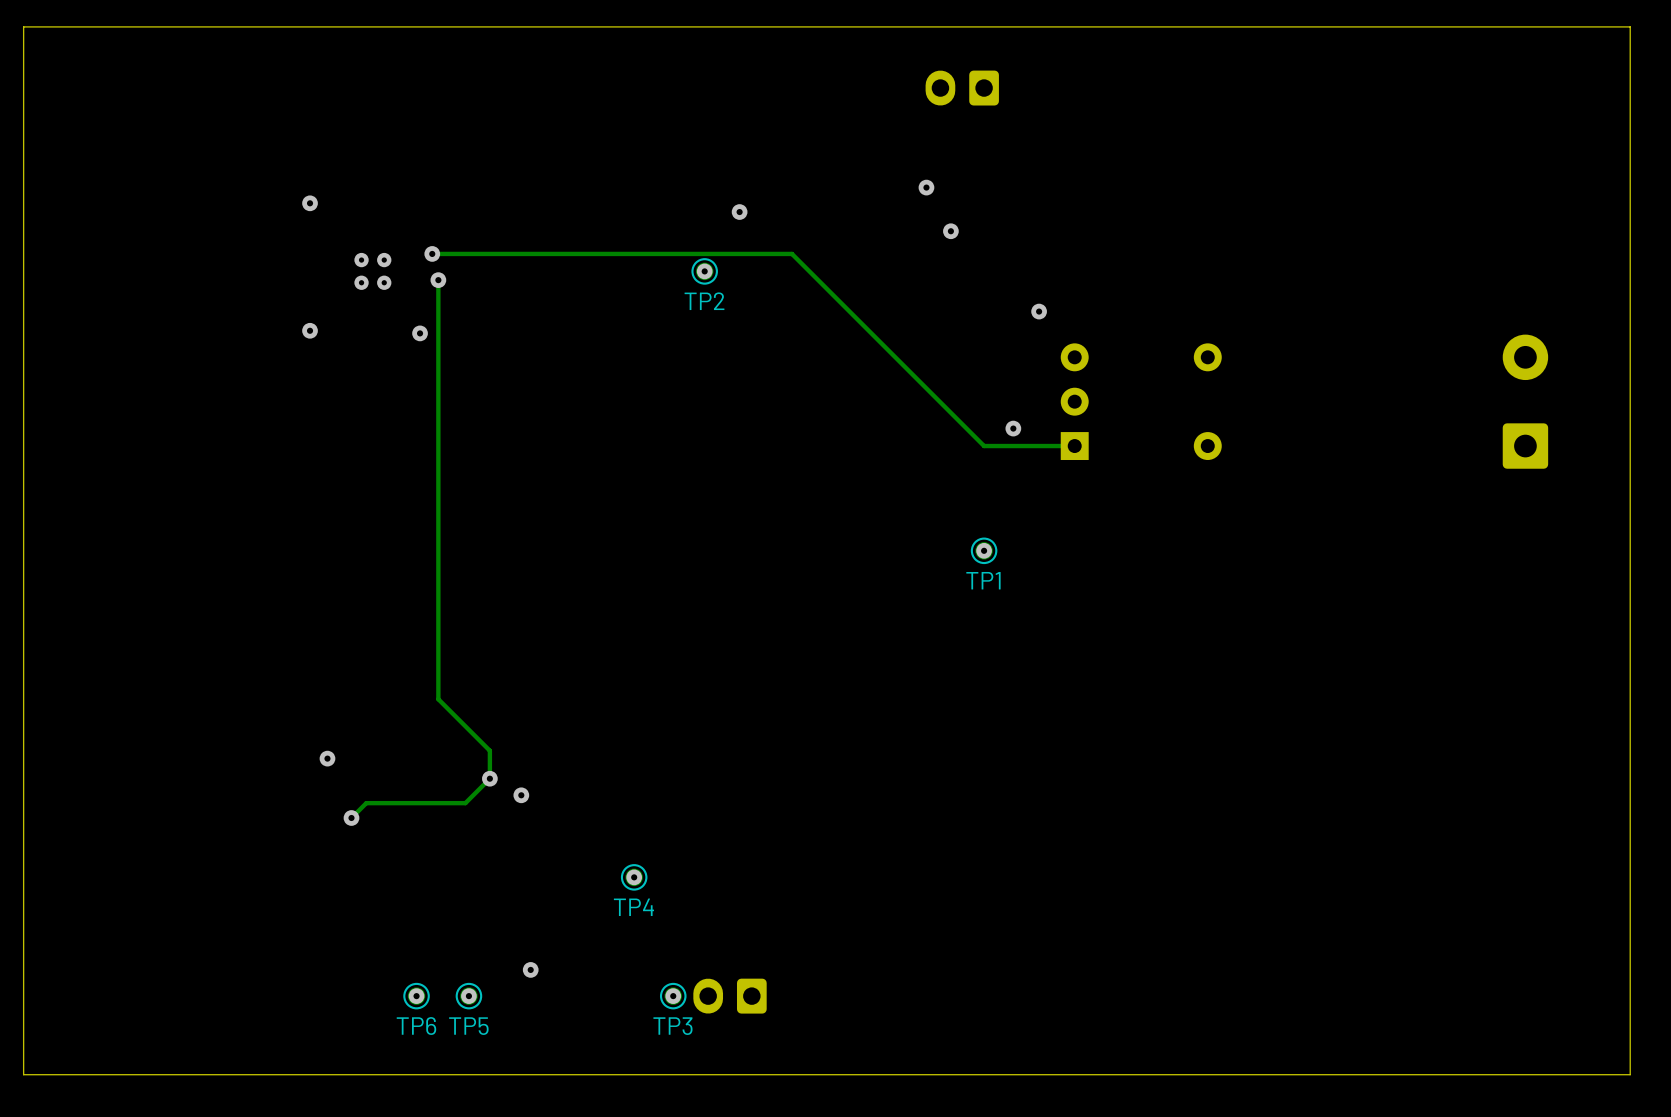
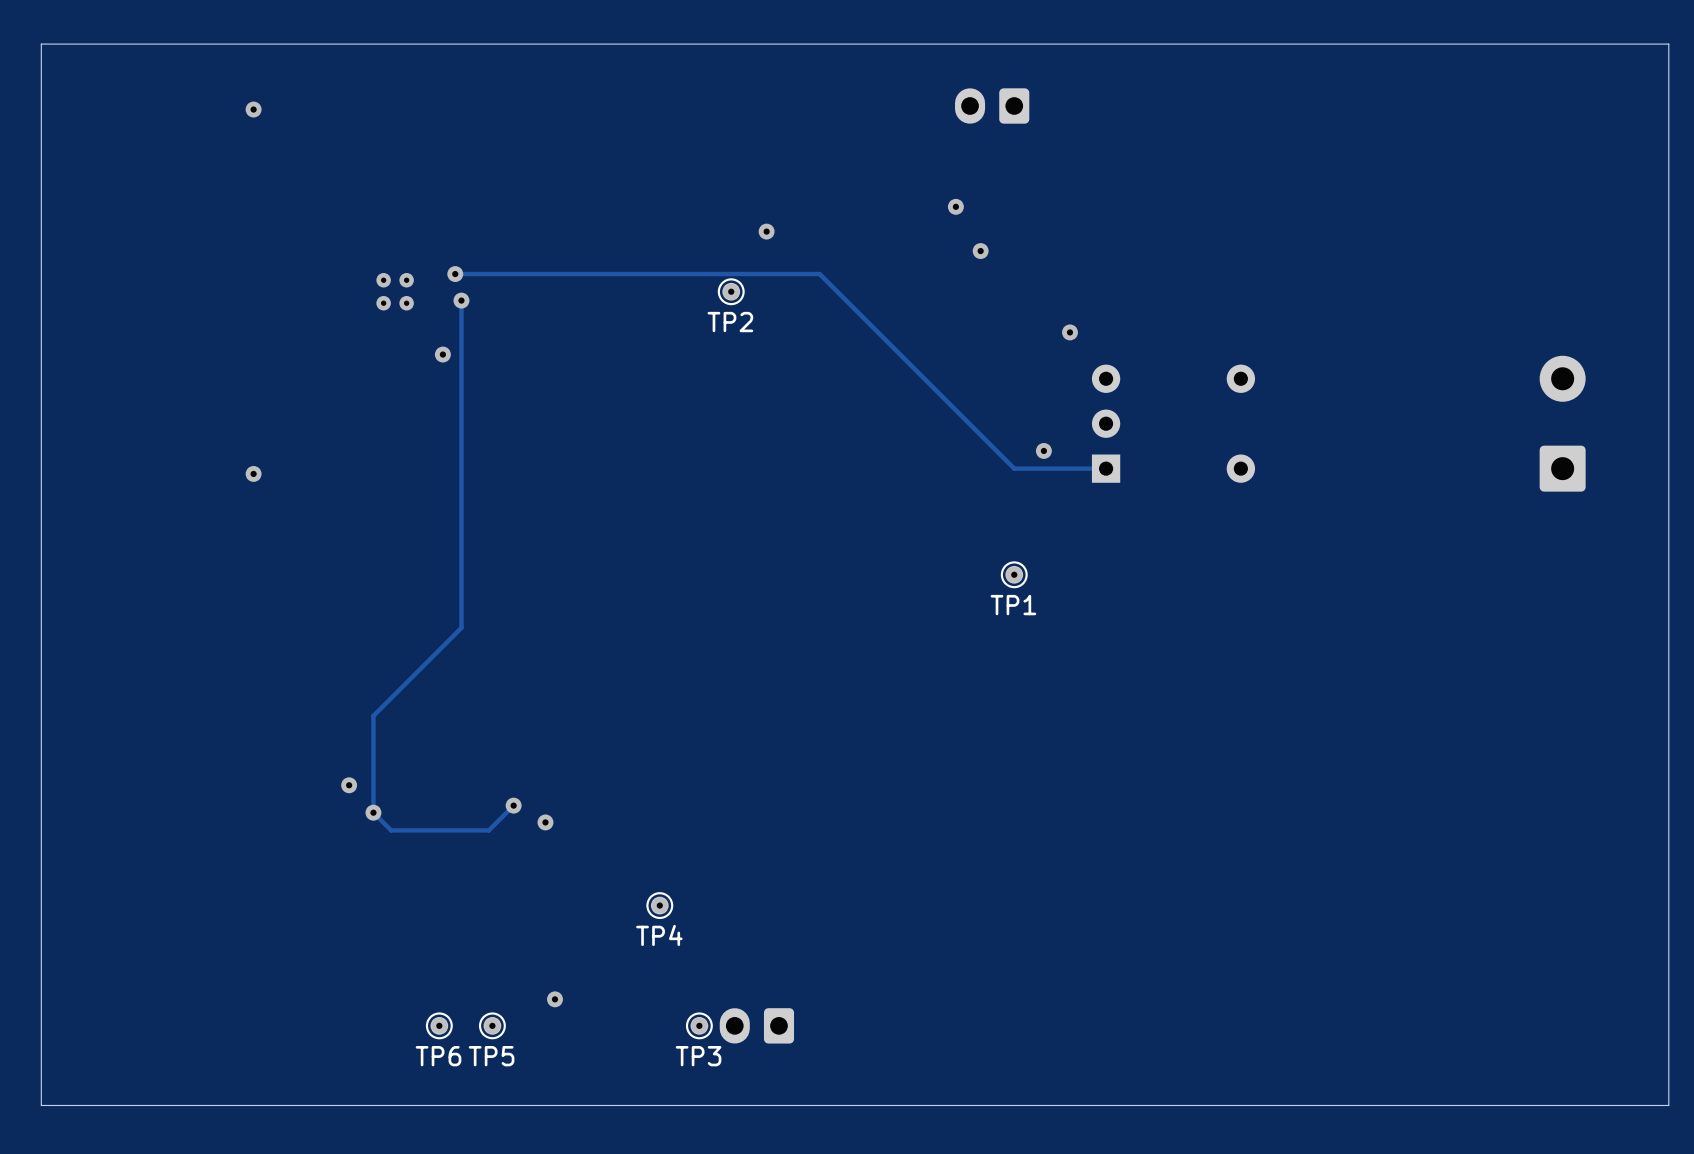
via: none -> (253, 109)
via: (310, 203) -> none
via: (310, 330) -> none
via: none -> (253, 473)
track: (438, 603) (438, 699) (489, 750) (489, 778) -> (461, 627) (373, 715) (373, 812) (391, 830)
track: (368, 803) (366, 803) (351, 817) -> none
via position: (351, 817) -> (373, 812)

